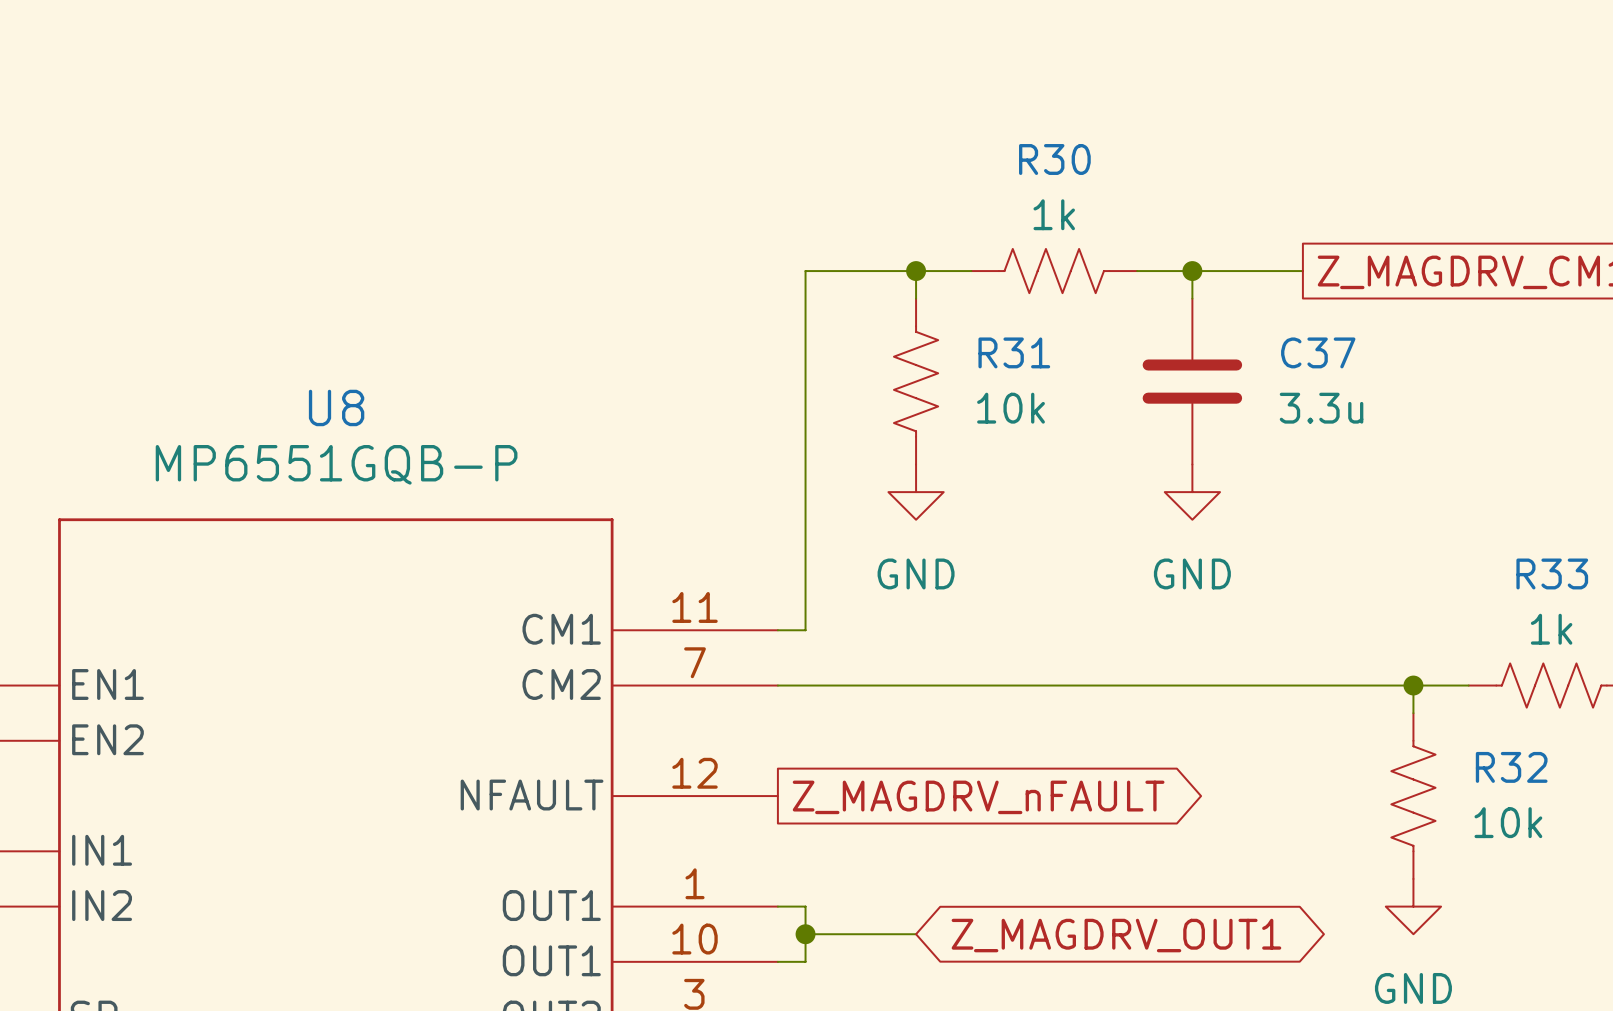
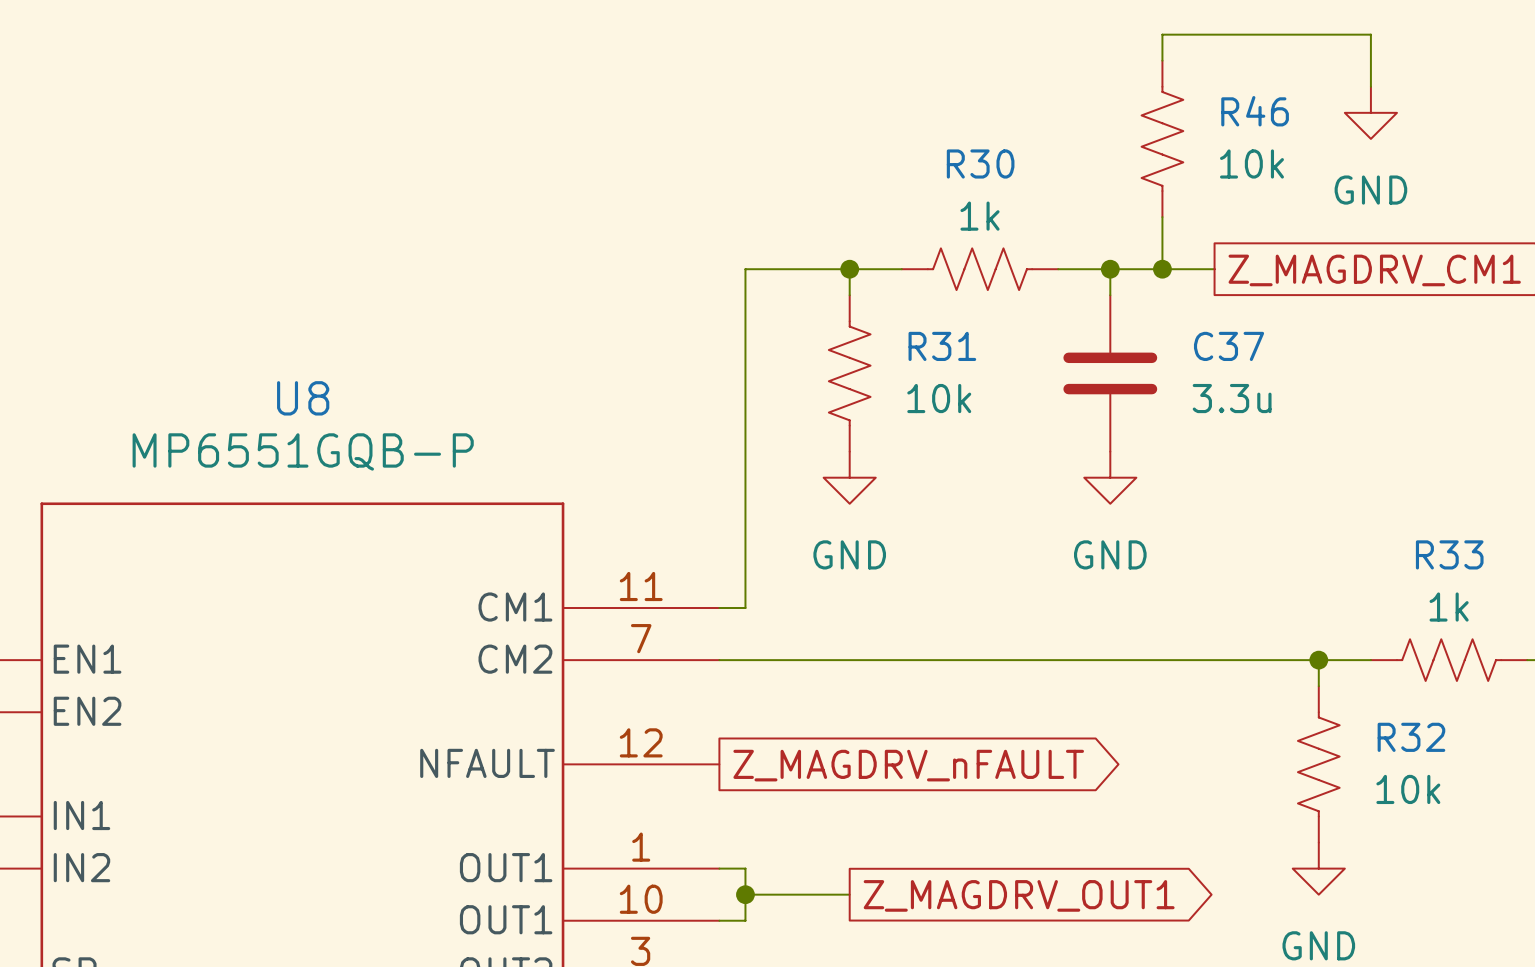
wire: none -> (1162, 60) (1162, 34) (1370, 34) (1370, 86)
power symbol: none -> GND (1370, 112)
R46: none -> 10k (1162, 138)
wire: none -> (1162, 217) (1162, 269)
junction: none -> (1162, 269)
global label shape: bidirectional (1116, 935) -> output (1019, 895)

